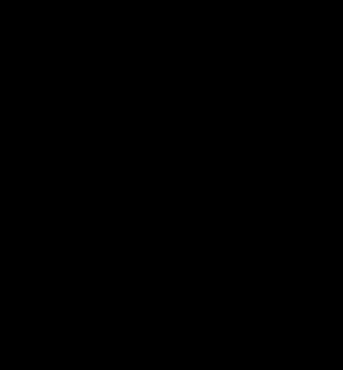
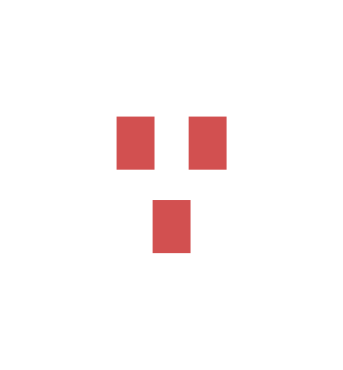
part: none -> (171, 184)

